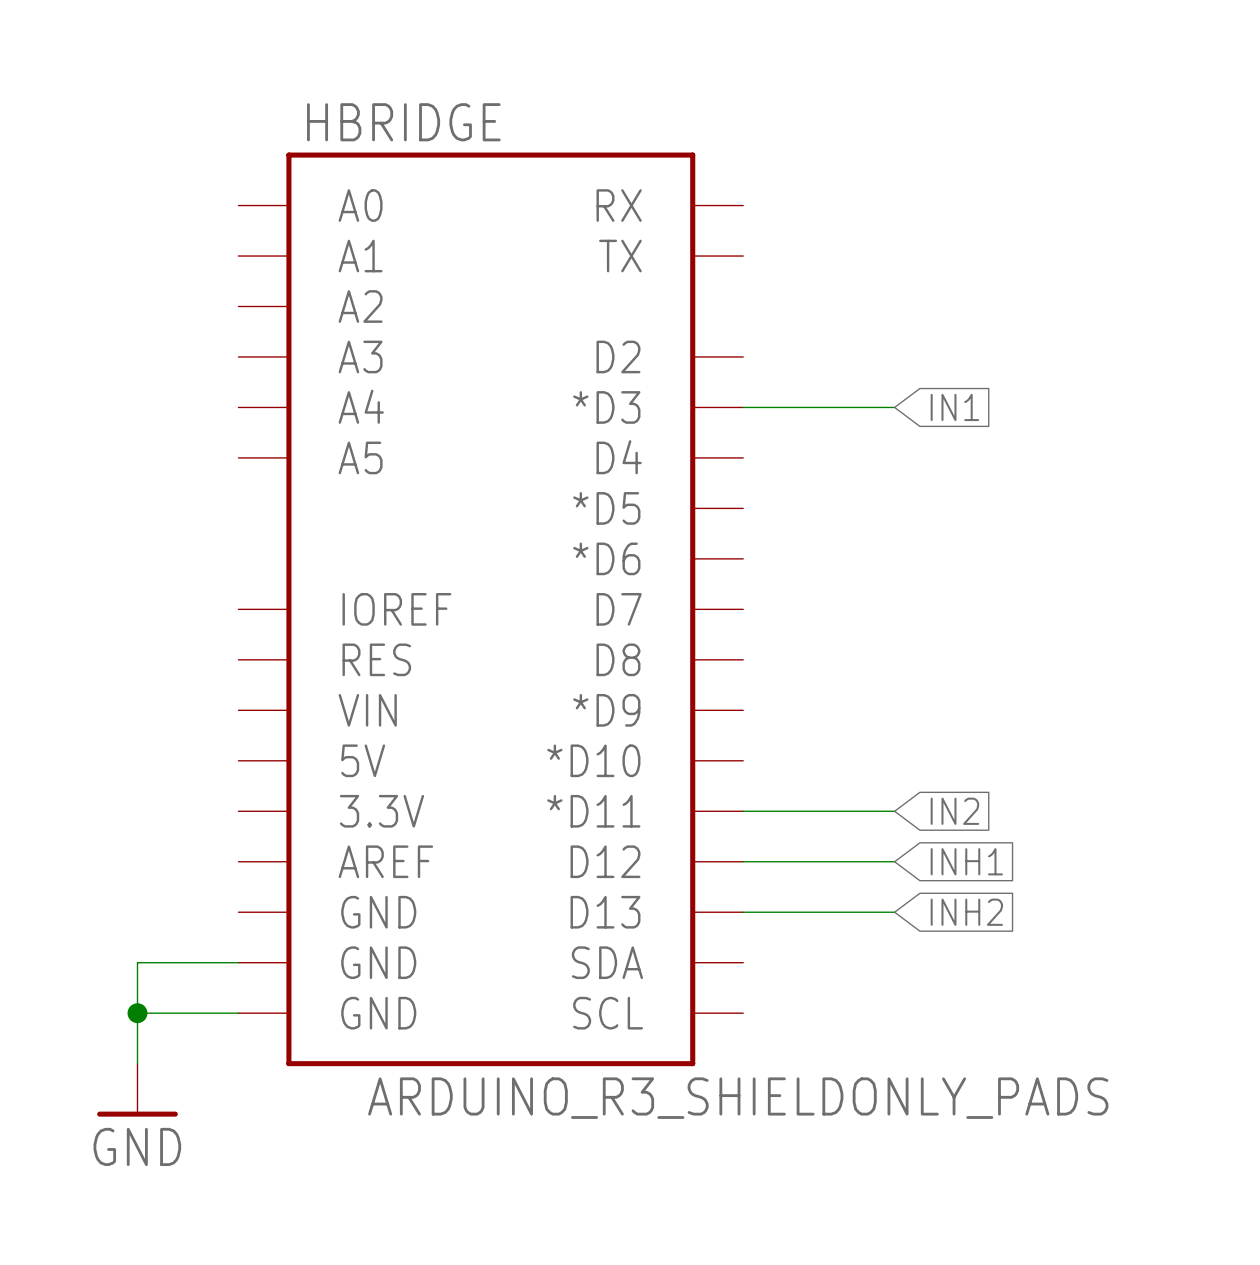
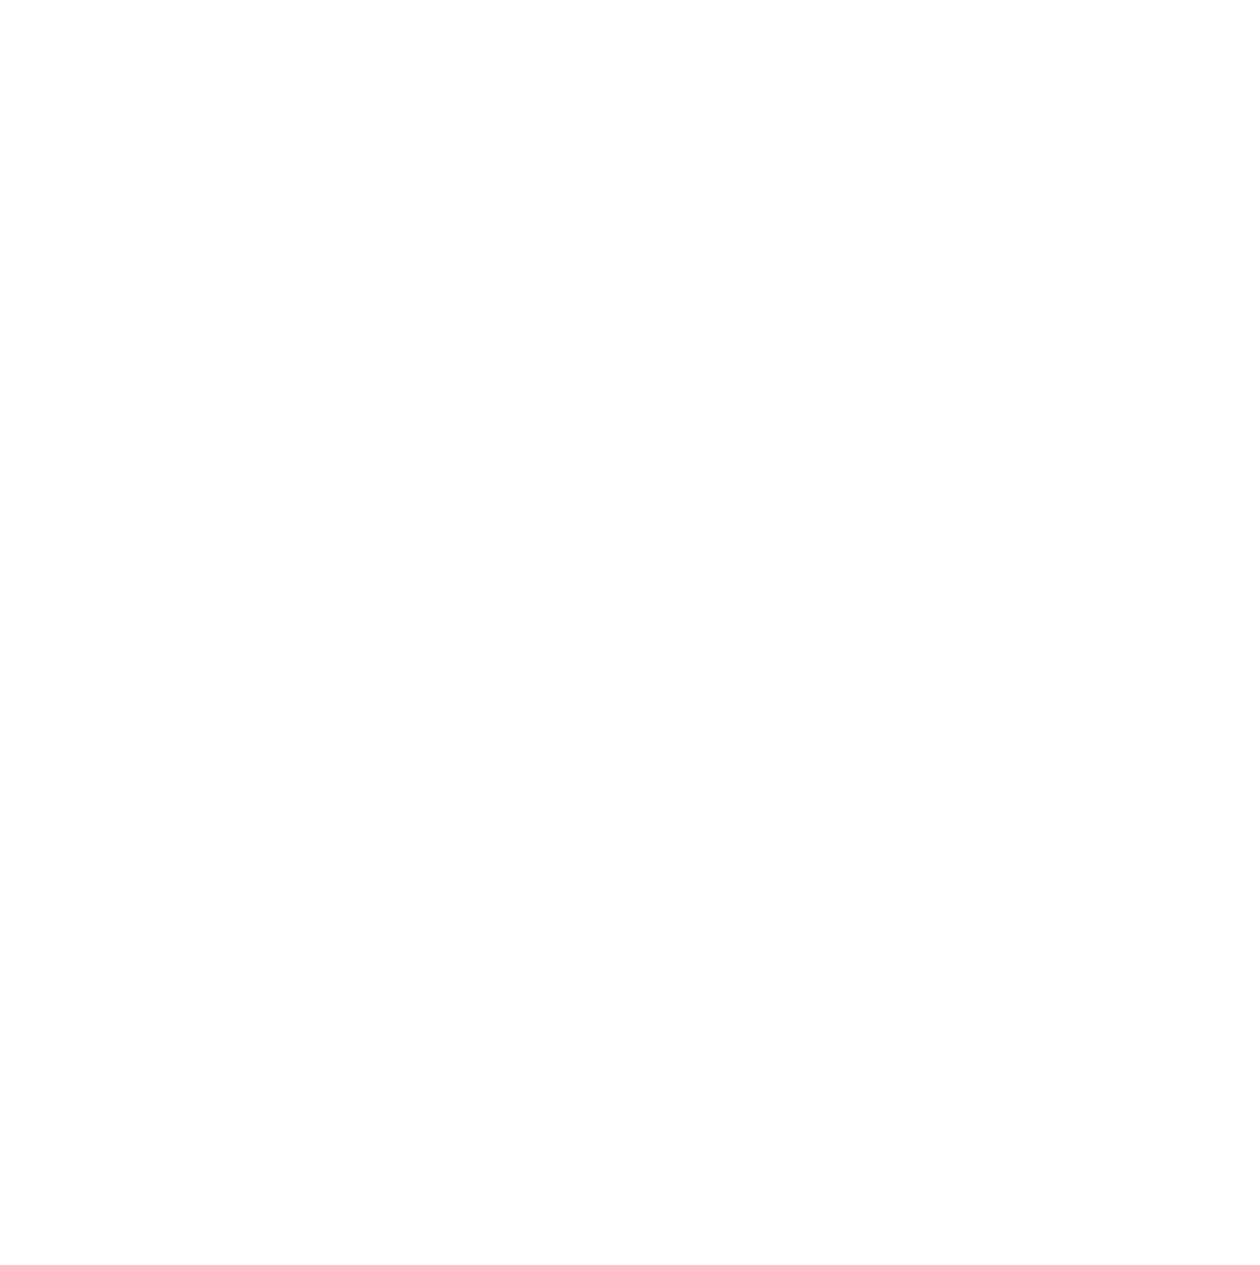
wire: (743, 407) (894, 407) -> none
global label: IN1 (954, 407) -> none
HBRIDGE: ARDUINO_R3_SHIELDONLY_PADS (490, 609) -> none
wire: (743, 811) (894, 811) -> none
global label: IN2 (954, 811) -> none
wire: (743, 861) (894, 861) -> none
global label: INH1 (966, 861) -> none
wire: (743, 912) (894, 912) -> none
global label: INH2 (966, 912) -> none
wire: (238, 962) (137, 962) (137, 1063) -> none
wire: (137, 1013) (238, 1013) -> none
junction: (137, 1013) -> none
power symbol: GND (137, 1090) -> none

